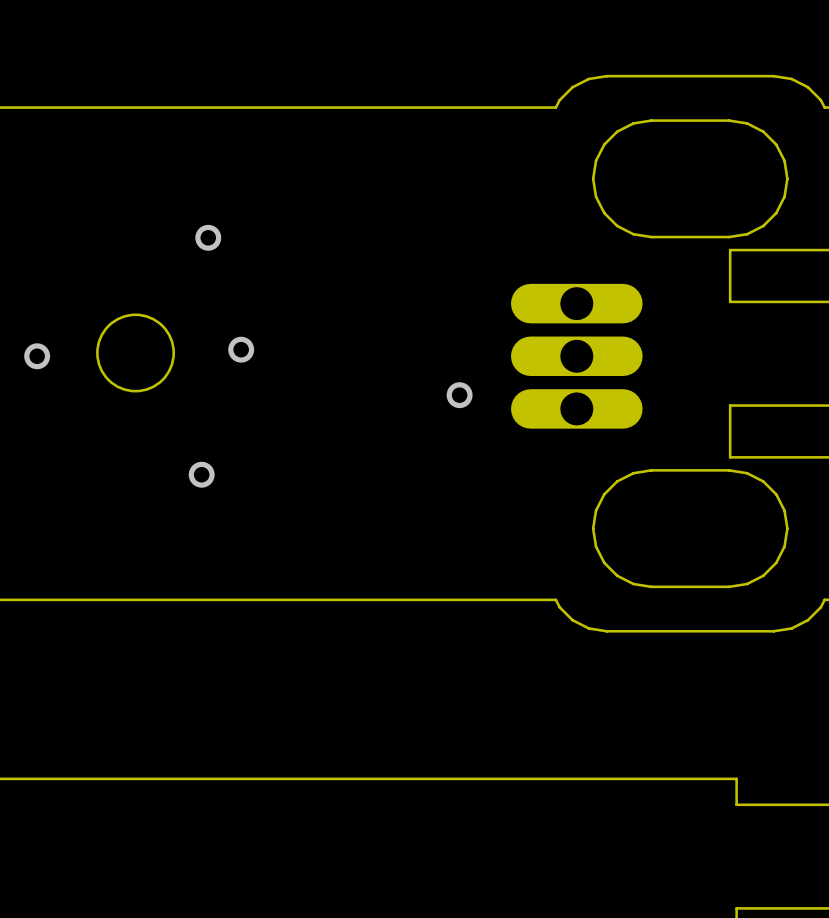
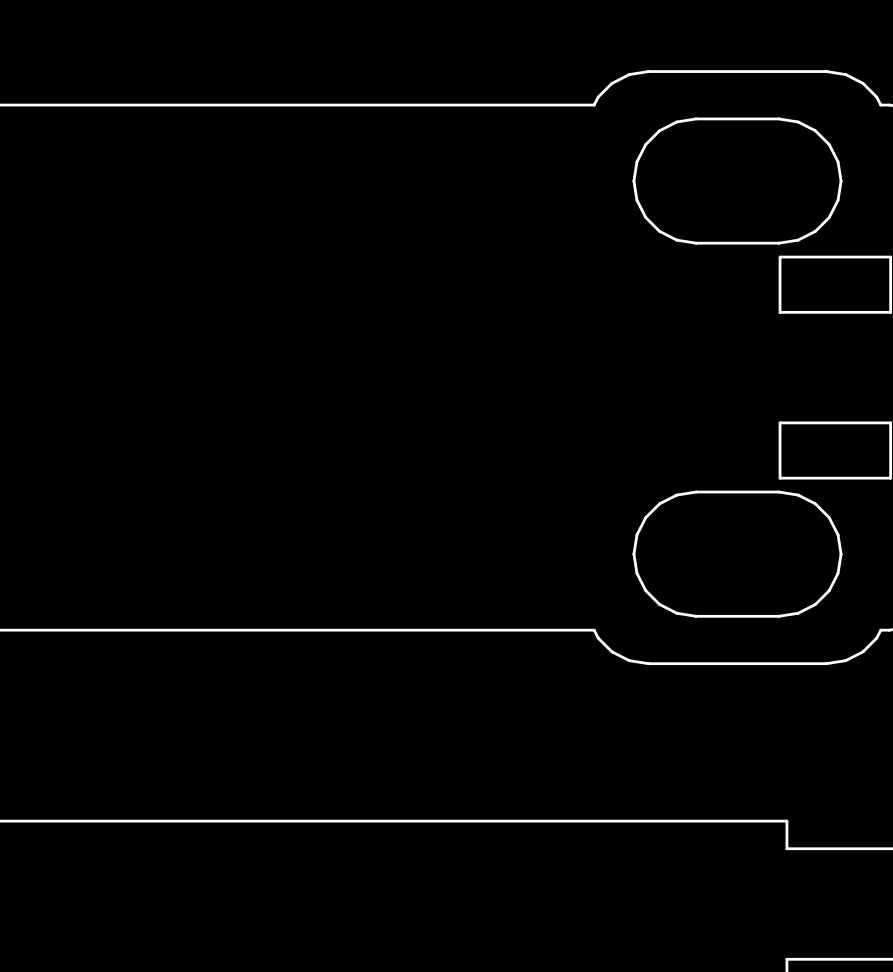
via: (208, 237) -> none
round board edge: [96, 313, 176, 393] -> none
via: (241, 349) -> none
via: (37, 356) -> none
part: (576, 356) -> none
via: (459, 395) -> none
via: (201, 474) -> none

